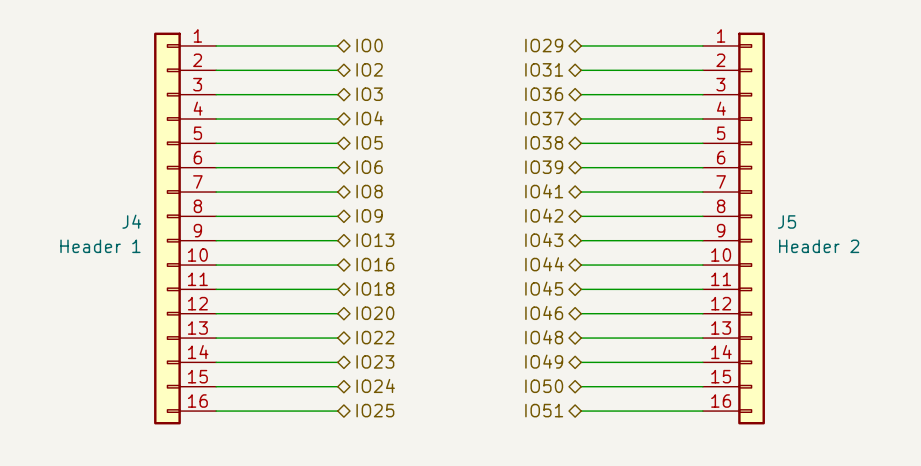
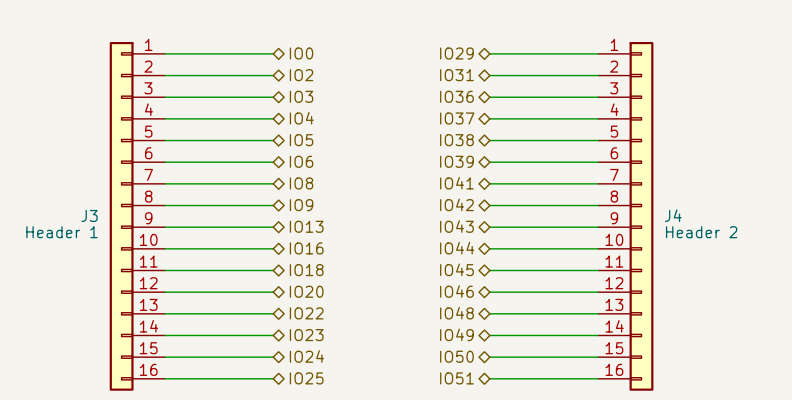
J4 name: J4 (131, 221) -> J3 (89, 215)
J5 name: J5 (787, 221) -> J4 (673, 215)

